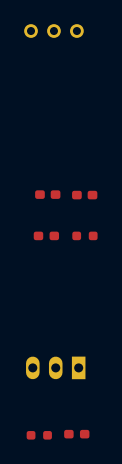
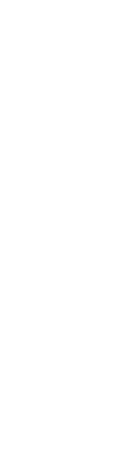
part: (53, 31) -> none
part: (47, 194) -> none
part: (84, 195) -> none
part: (46, 235) -> none
part: (84, 235) -> none
part: (55, 367) -> none
part: (76, 434) -> none
part: (39, 435) -> none

